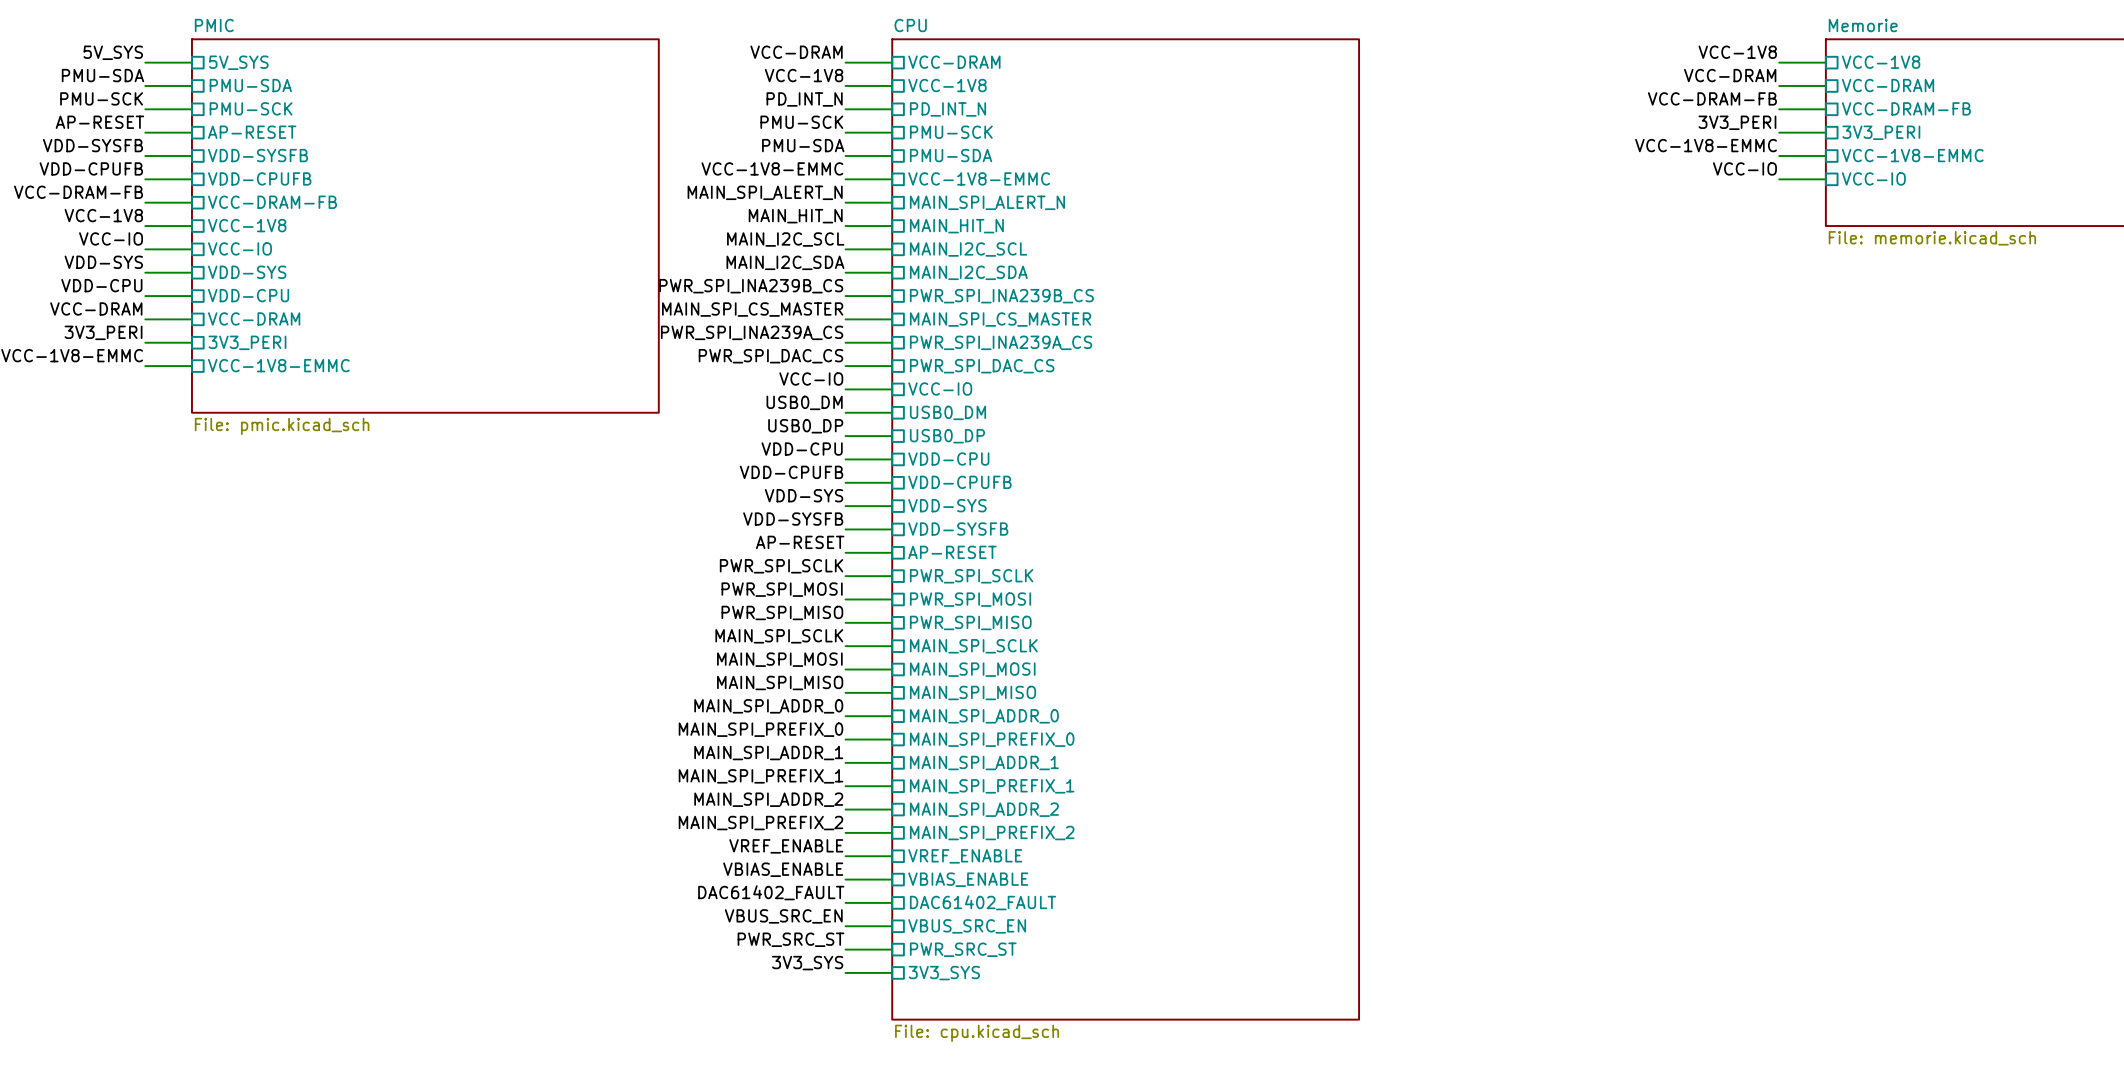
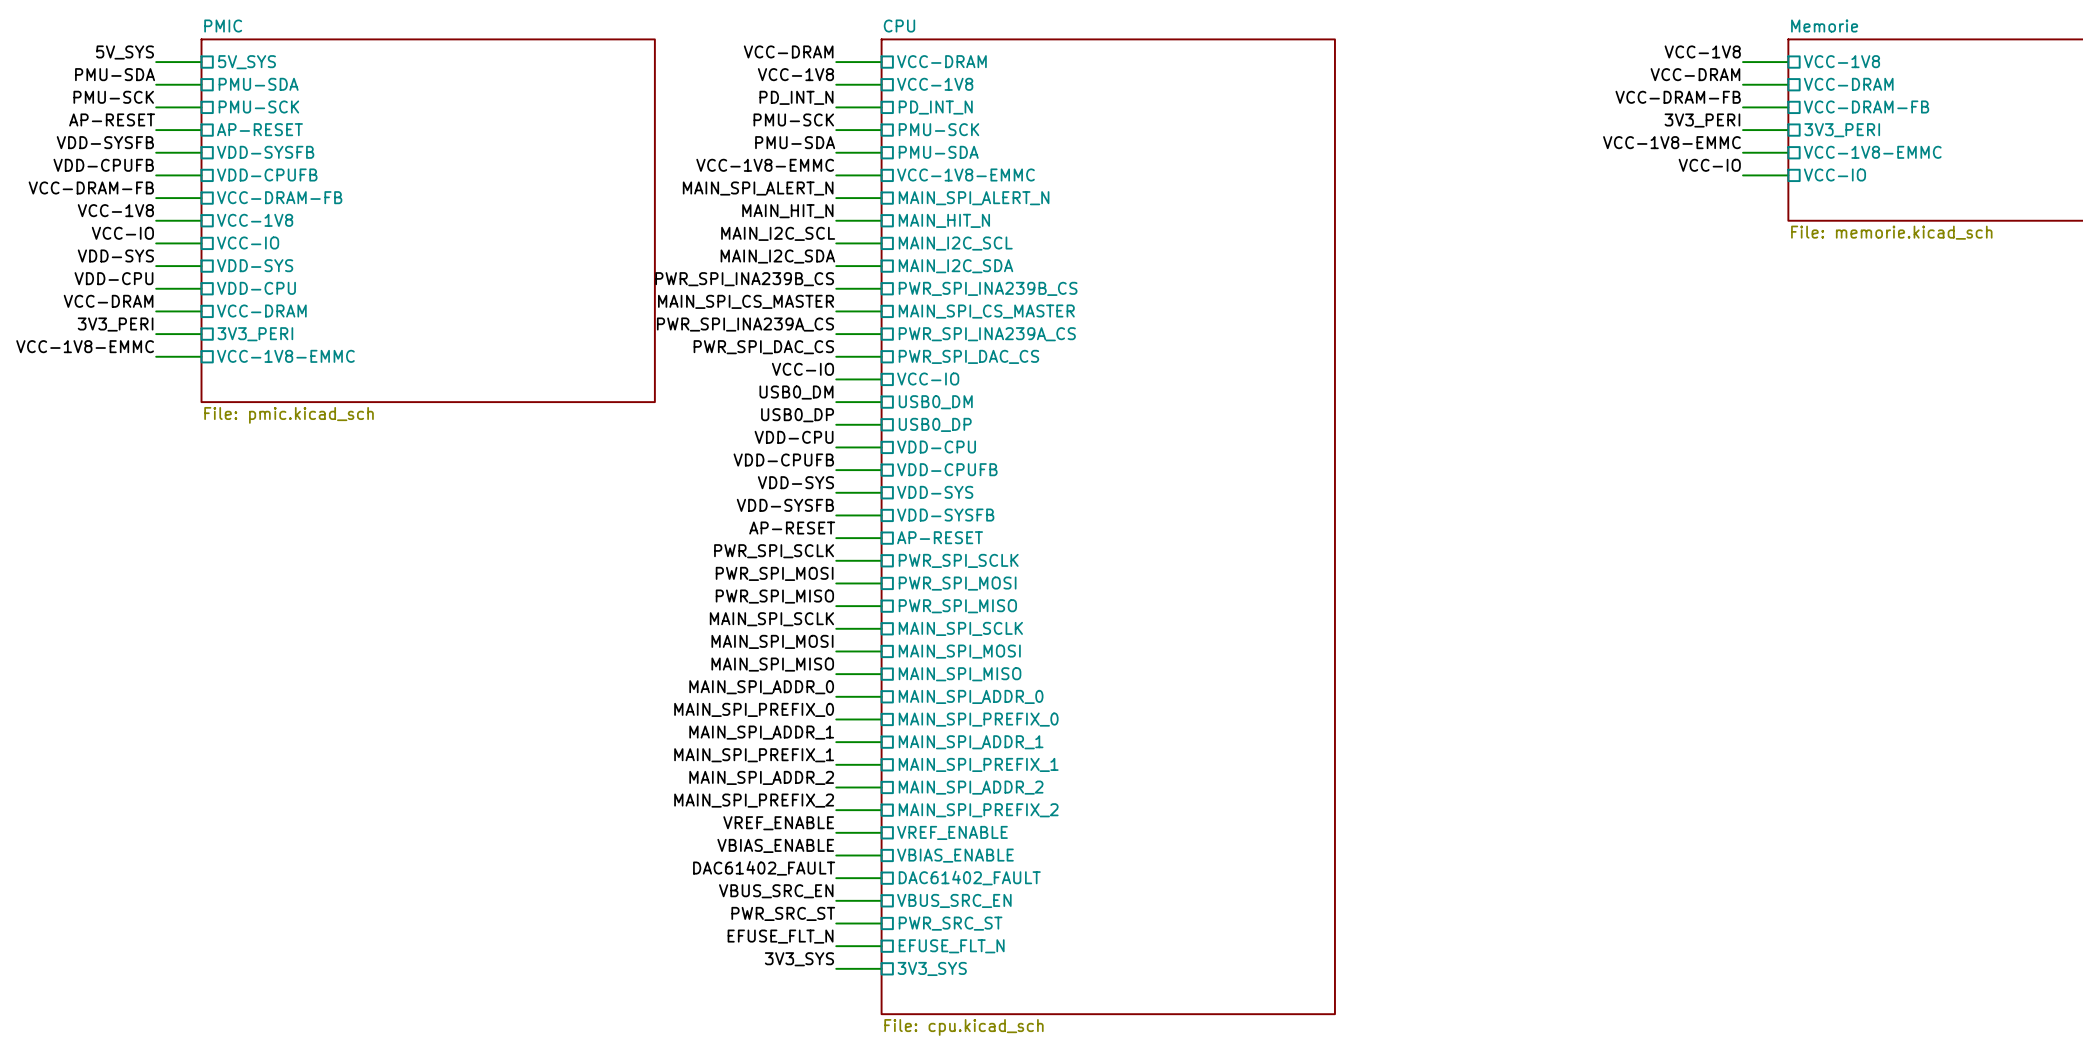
sheet CPU: File: cpu.kicad_sch (1125, 529) -> none
sheet CPU: none -> File: cpu.kicad_sch (1108, 526)
label: 3V3_SYS (807, 963) -> EFUSE_FLT_N (780, 936)
sheet pin: 3V3_SYS (944, 973) -> EFUSE_FLT_N (951, 946)
label: none -> 3V3_SYS (799, 959)
wire: none -> (836, 968) (881, 968)
sheet pin: none -> 3V3_SYS (932, 968)

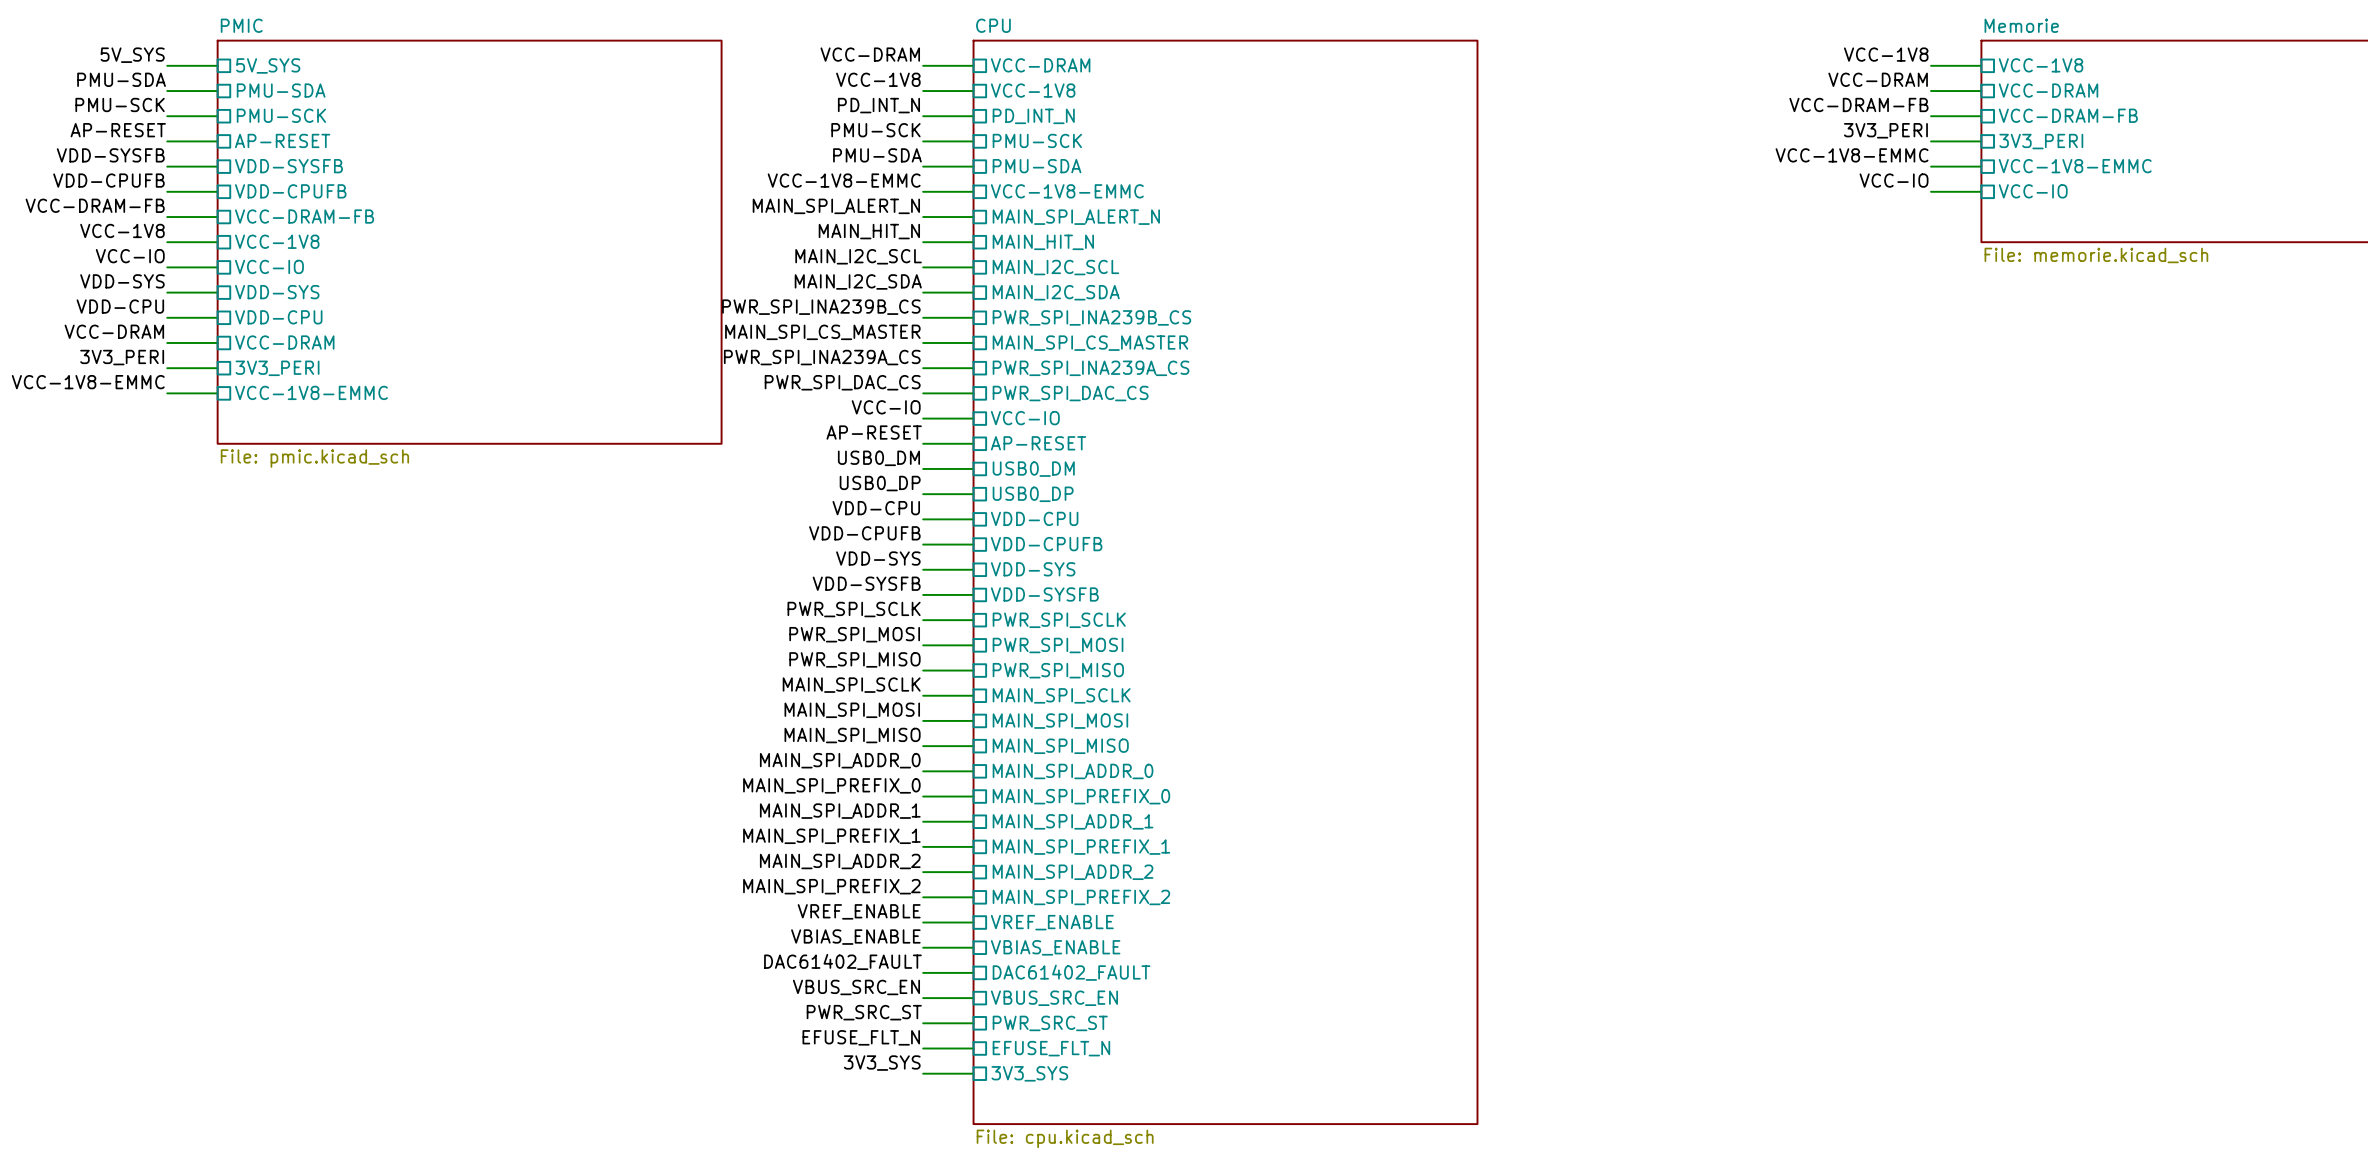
label: USB0_DM (796, 392) -> AP-RESET (874, 432)
sheet pin: USB0_DM (935, 402) -> AP-RESET (1038, 443)
label: USB0_DP (797, 415) -> USB0_DM (878, 458)
sheet pin: USB0_DP (935, 424) -> USB0_DM (1033, 469)
label: VDD-CPU (794, 437) -> USB0_DP (880, 483)
sheet pin: VDD-CPU (936, 447) -> USB0_DP (1033, 494)
label: VDD-CPUFB (783, 460) -> VDD-CPU (876, 508)
sheet pin: VDD-CPUFB (947, 469) -> VDD-CPU (1034, 518)
label: VDD-SYS (795, 482) -> VDD-CPUFB (864, 533)
sheet pin: VDD-SYS (935, 492) -> VDD-CPUFB (1046, 544)
label: VDD-SYSFB (785, 505) -> VDD-SYS (878, 558)
sheet pin: VDD-SYSFB (945, 515) -> VDD-SYS (1033, 569)
label: AP-RESET (792, 528) -> VDD-SYSFB (866, 583)
sheet pin: AP-RESET (940, 537) -> VDD-SYSFB (1044, 594)

